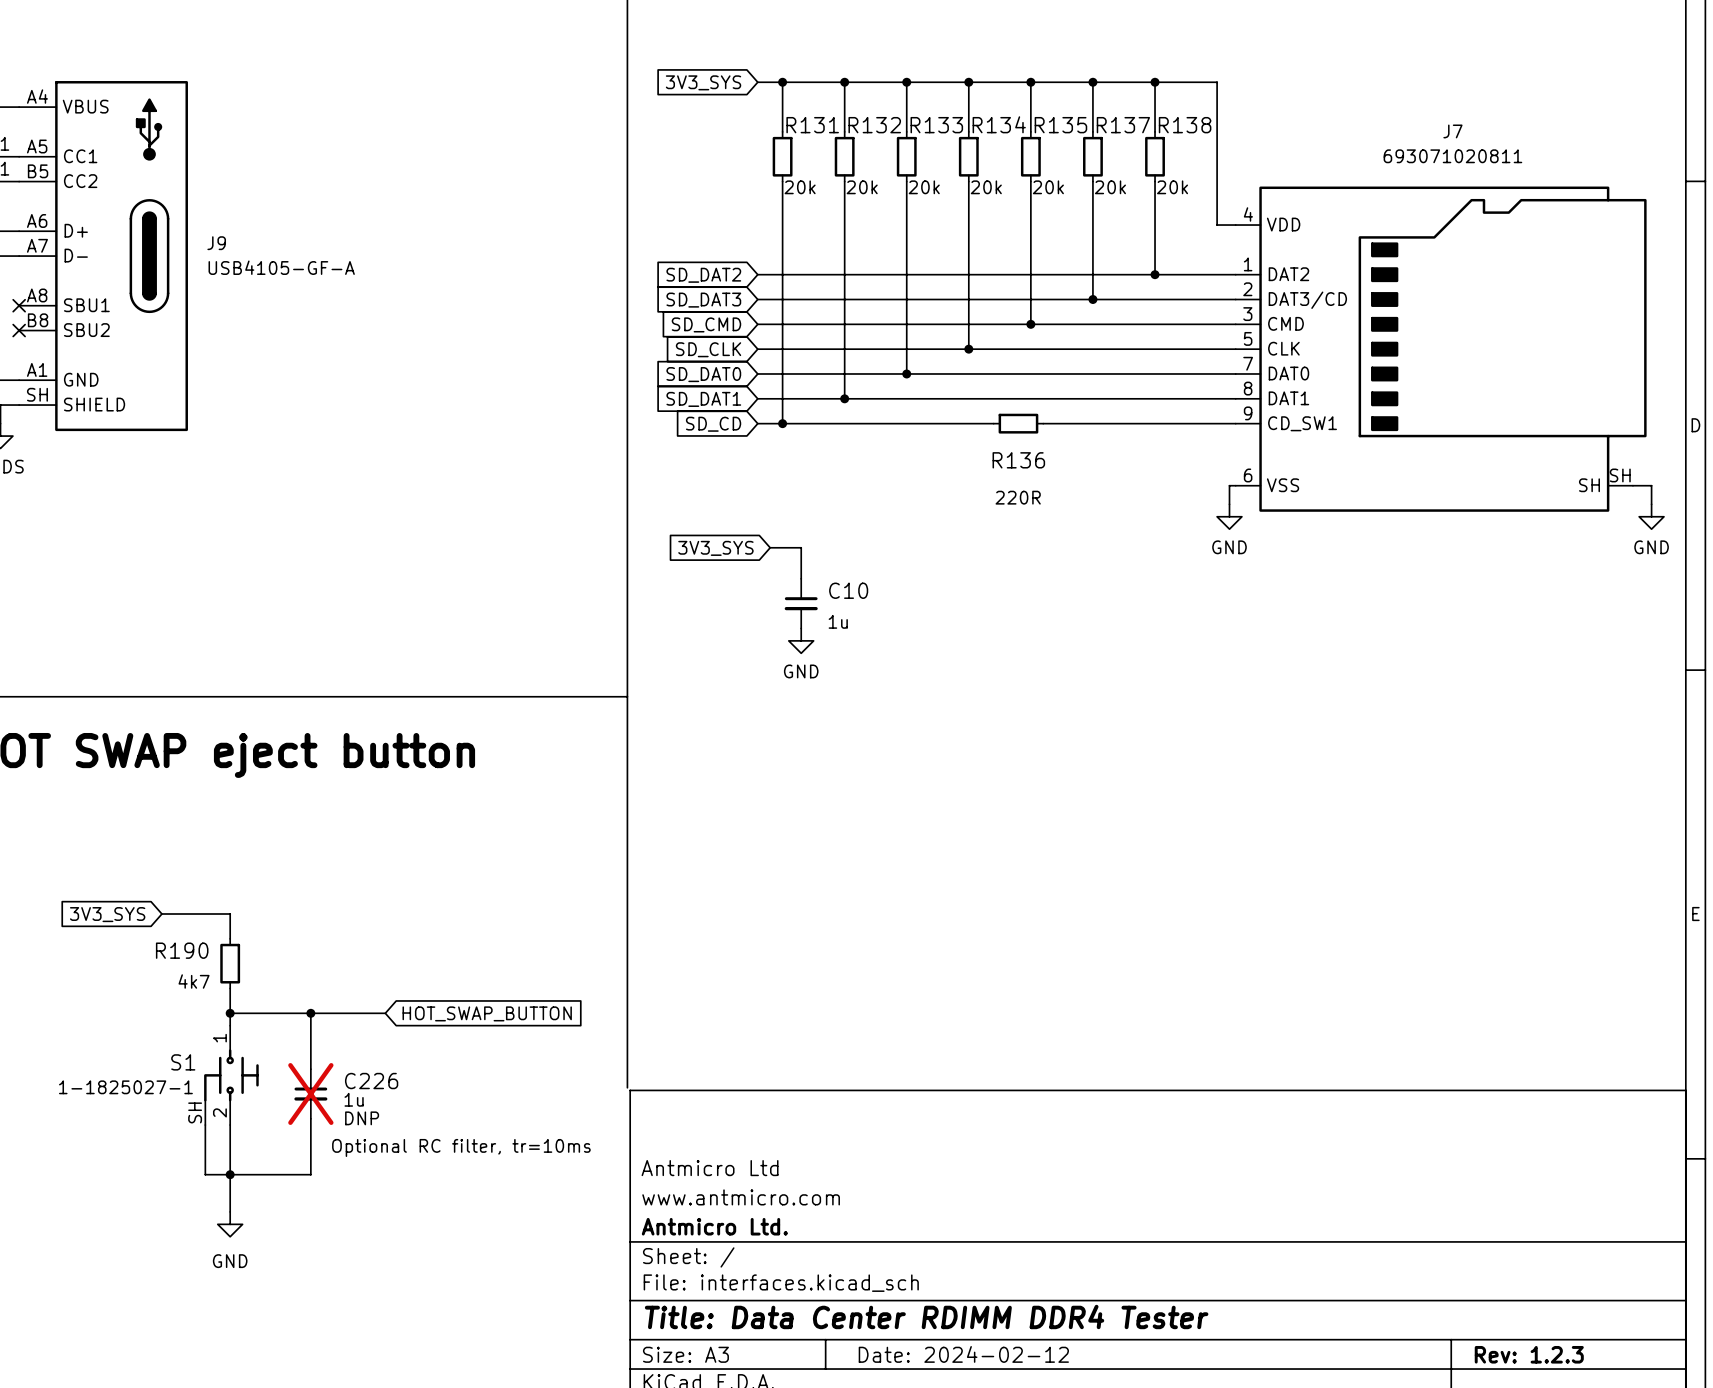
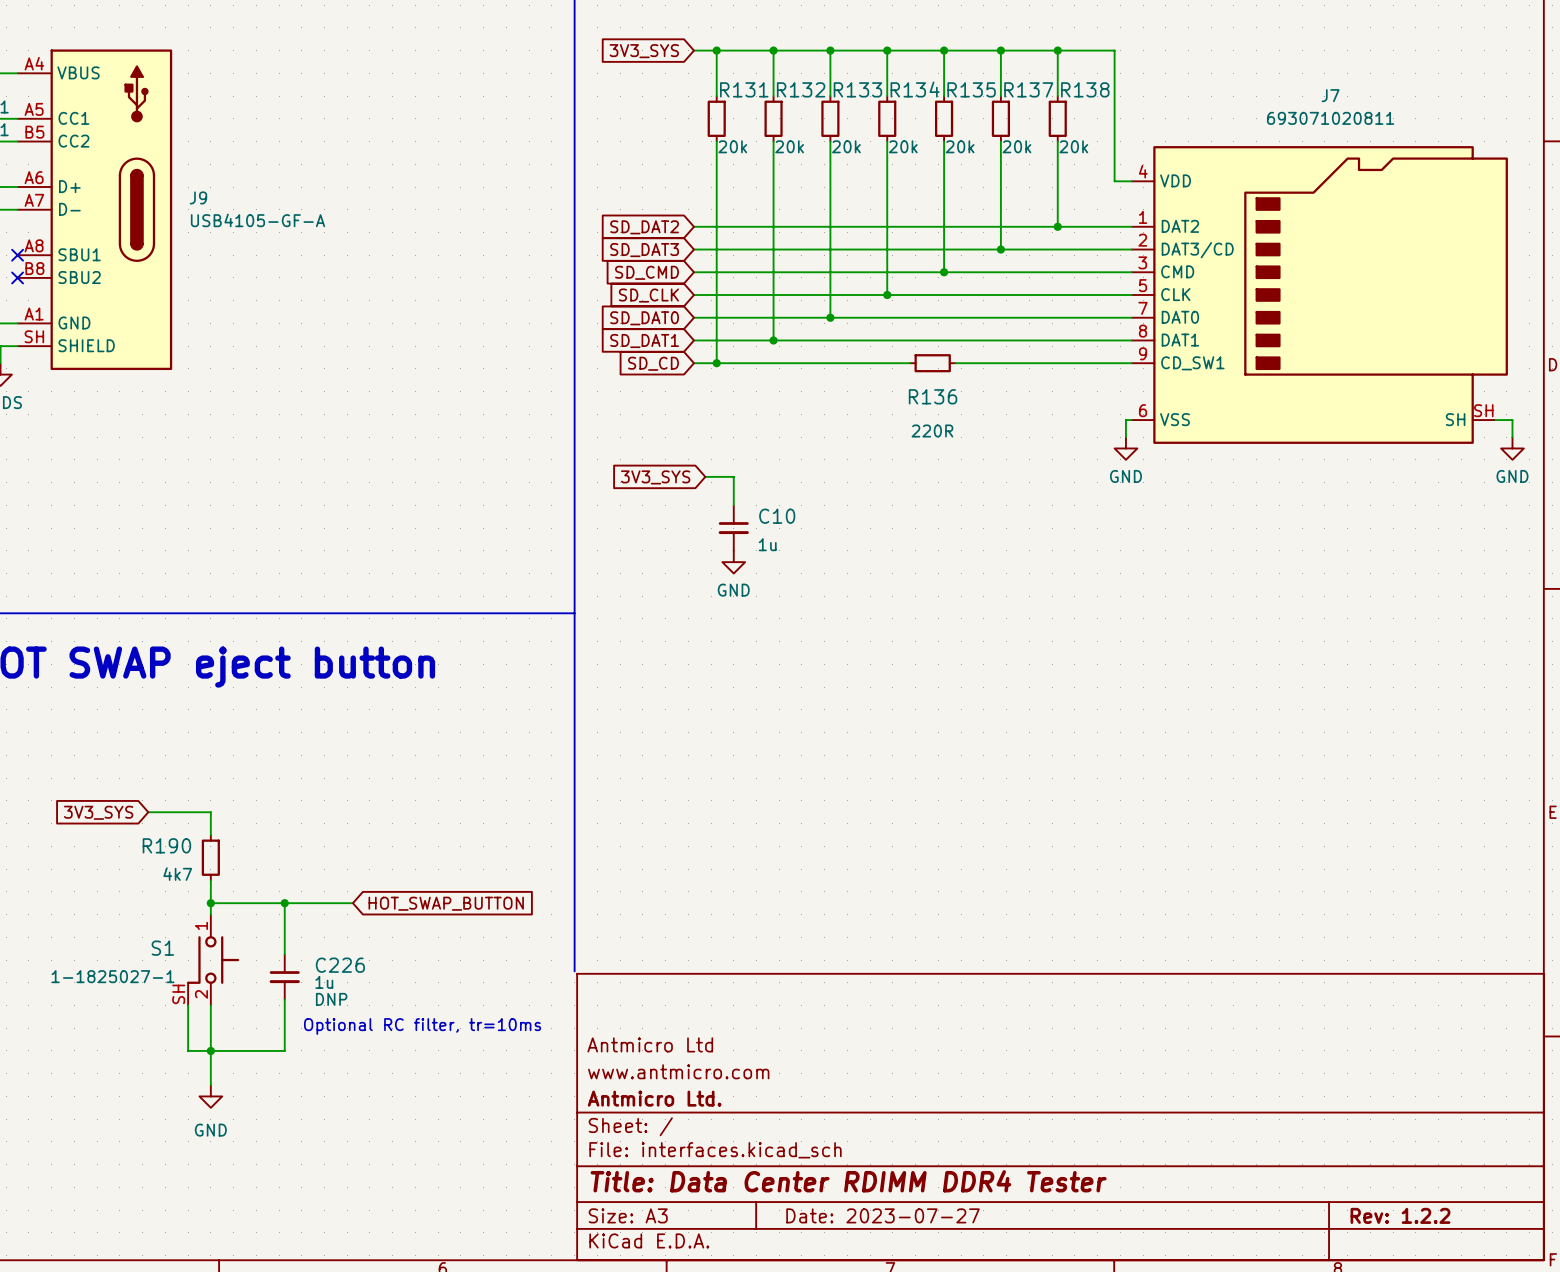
S1 symbol: [204, 1025, 259, 1126] -> [186, 914, 240, 1006]
C226 do-not-place cross: (310, 1094) -> none
title block: Date: 2024-02-12 (963, 1354) -> Date: 2023-07-27 (883, 1215)
title block: Rev: 1.2.3 (1529, 1354) -> Rev: 1.2.2 (1400, 1215)

